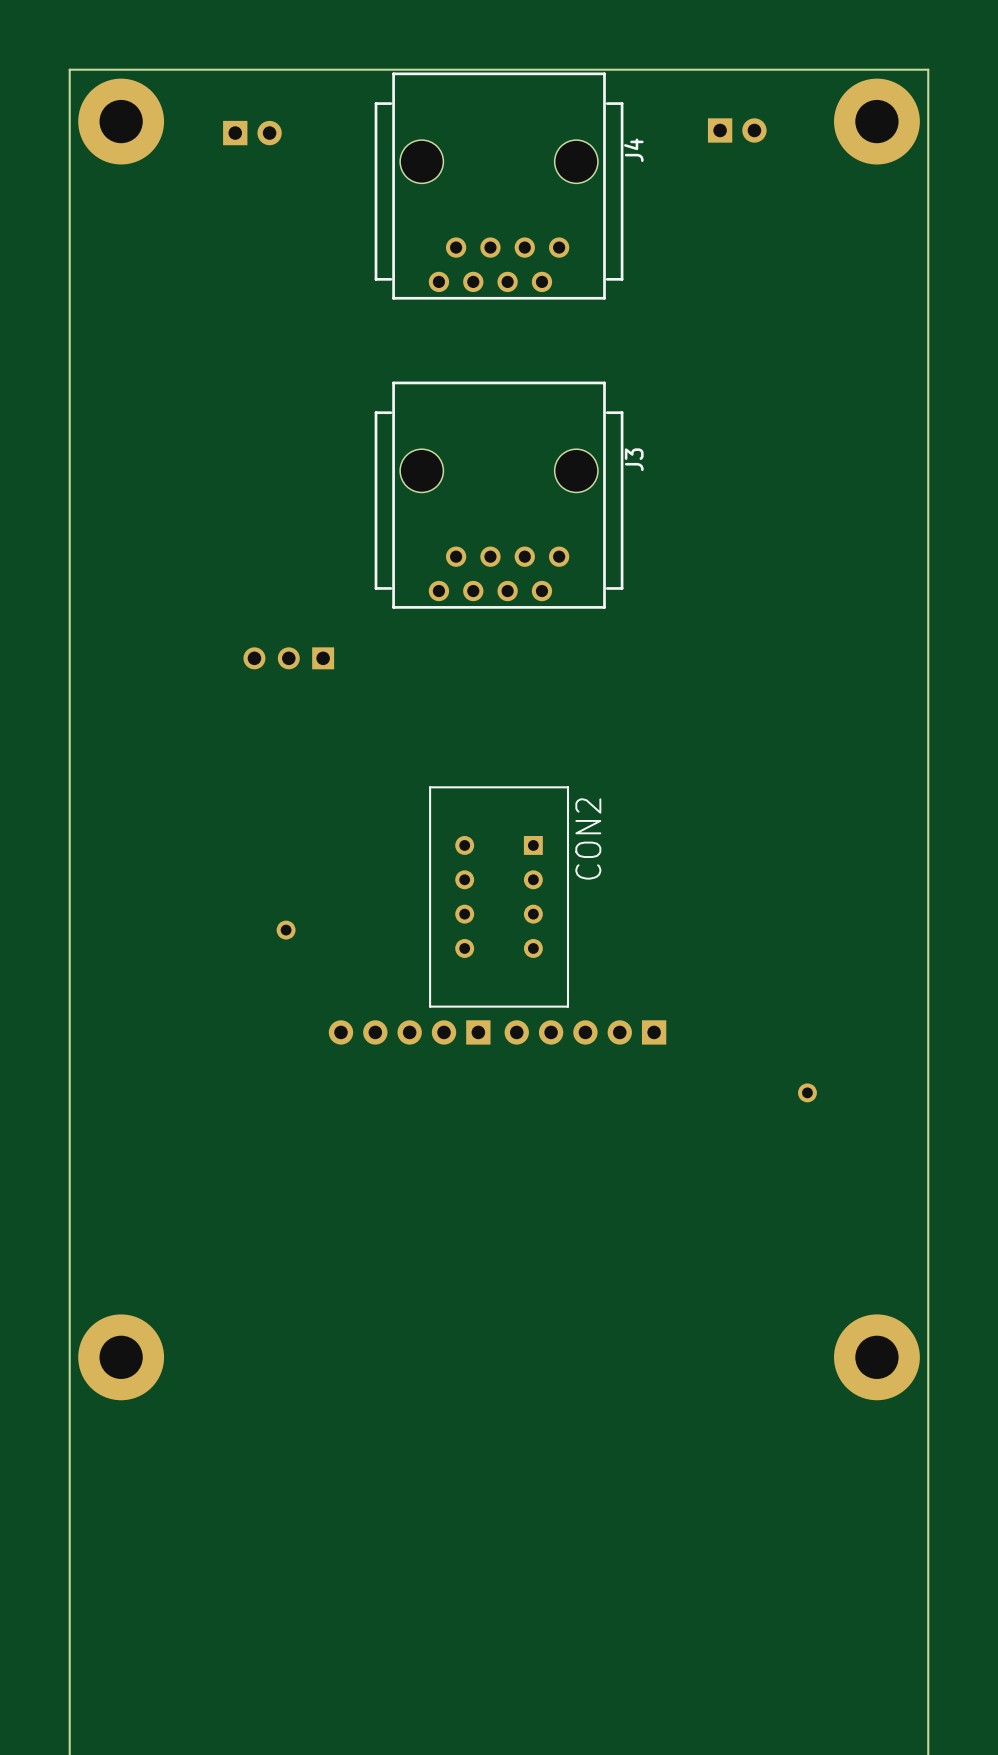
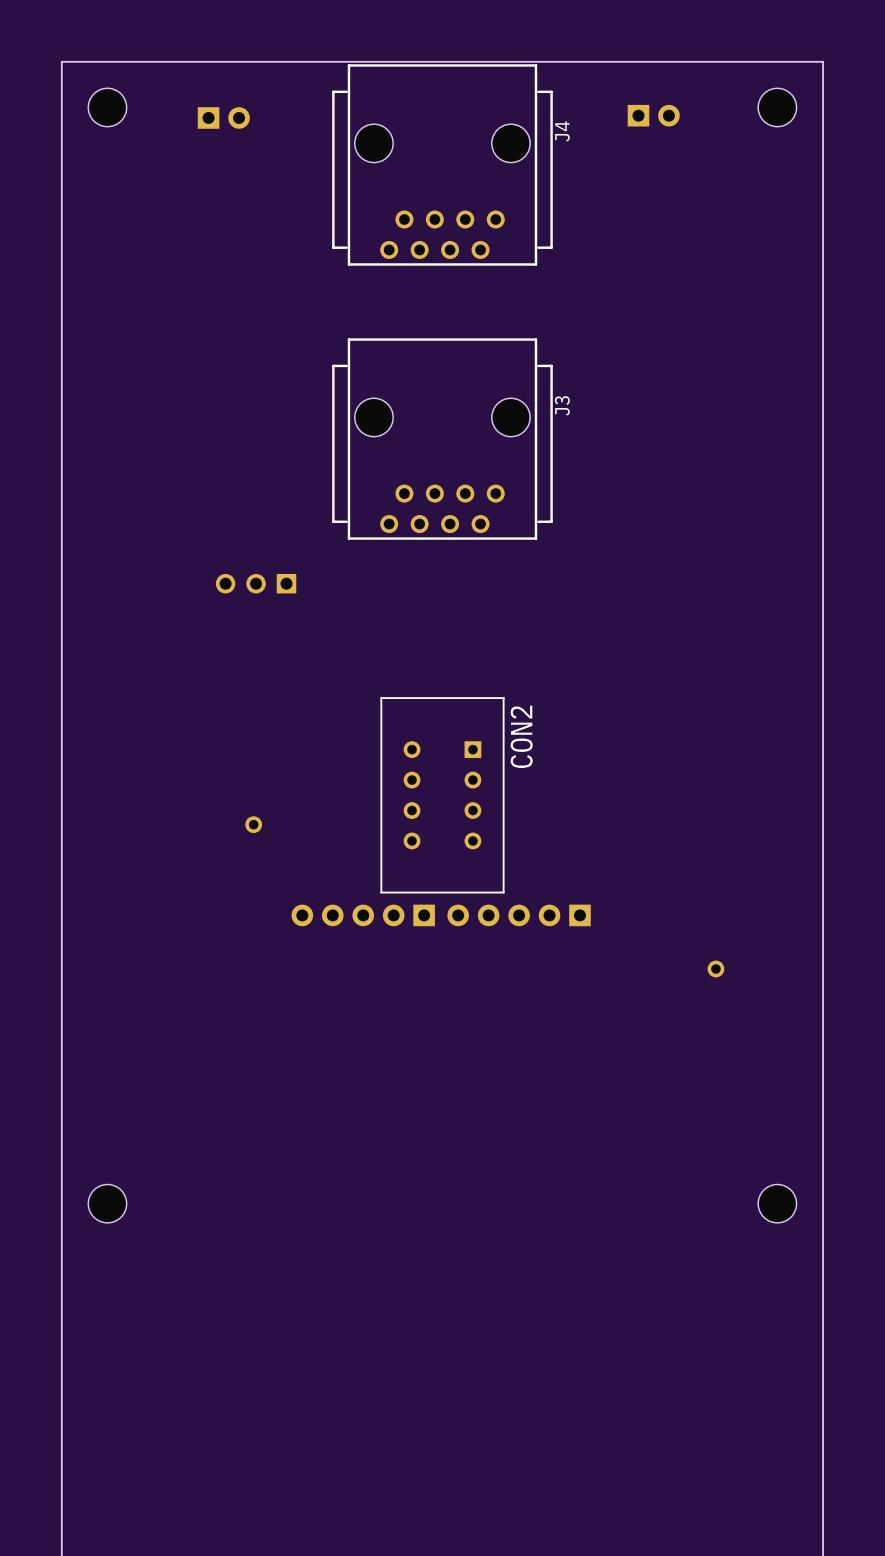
part footprint: [78, 78, 165, 165] -> [88, 88, 127, 127]
part footprint: [834, 78, 920, 165] -> [758, 88, 797, 127]
part footprint: [78, 1314, 165, 1401] -> [88, 1184, 127, 1223]
part footprint: [834, 1314, 920, 1401] -> [758, 1184, 797, 1223]

